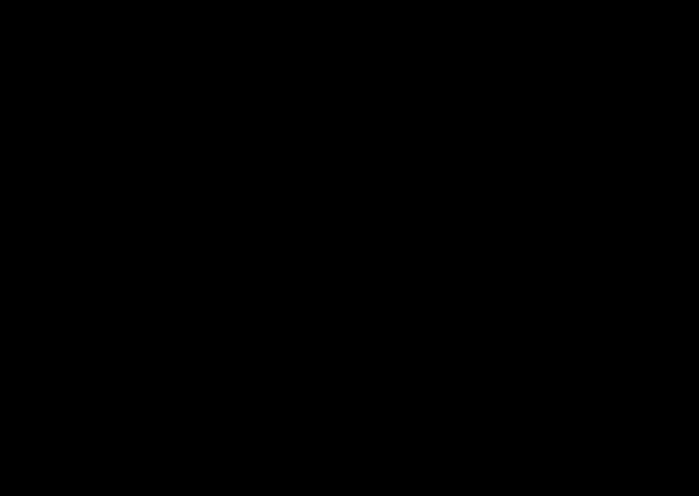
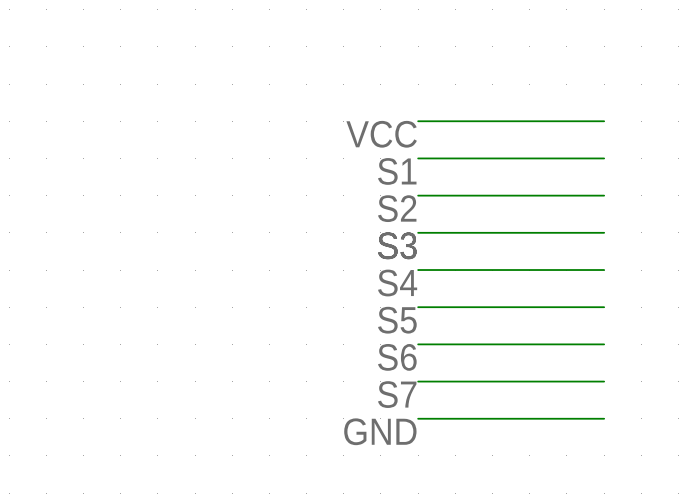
wire: none -> (418, 121) (604, 121)
label: none -> VCC (381, 134)
wire: none -> (418, 158) (604, 158)
label: none -> S1 (397, 171)
wire: none -> (418, 195) (604, 195)
label: none -> S2 (397, 208)
wire: none -> (418, 232) (604, 232)
label: none -> S3 (397, 245)
wire: none -> (418, 270) (604, 270)
label: none -> S4 (397, 283)
wire: none -> (418, 307) (604, 307)
label: none -> S5 (397, 320)
wire: none -> (418, 344) (604, 344)
label: none -> S6 (397, 357)
wire: none -> (418, 381) (604, 381)
label: none -> S7 (397, 394)
wire: none -> (418, 418) (604, 418)
label: none -> GND (380, 431)

